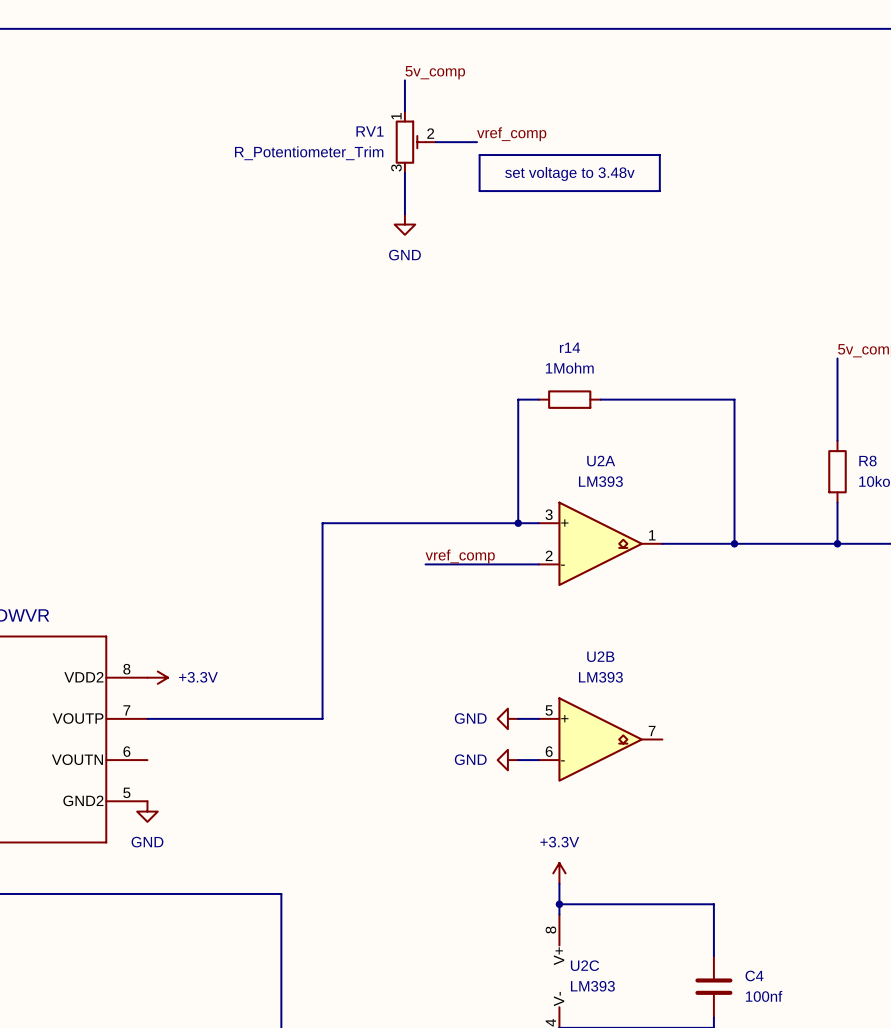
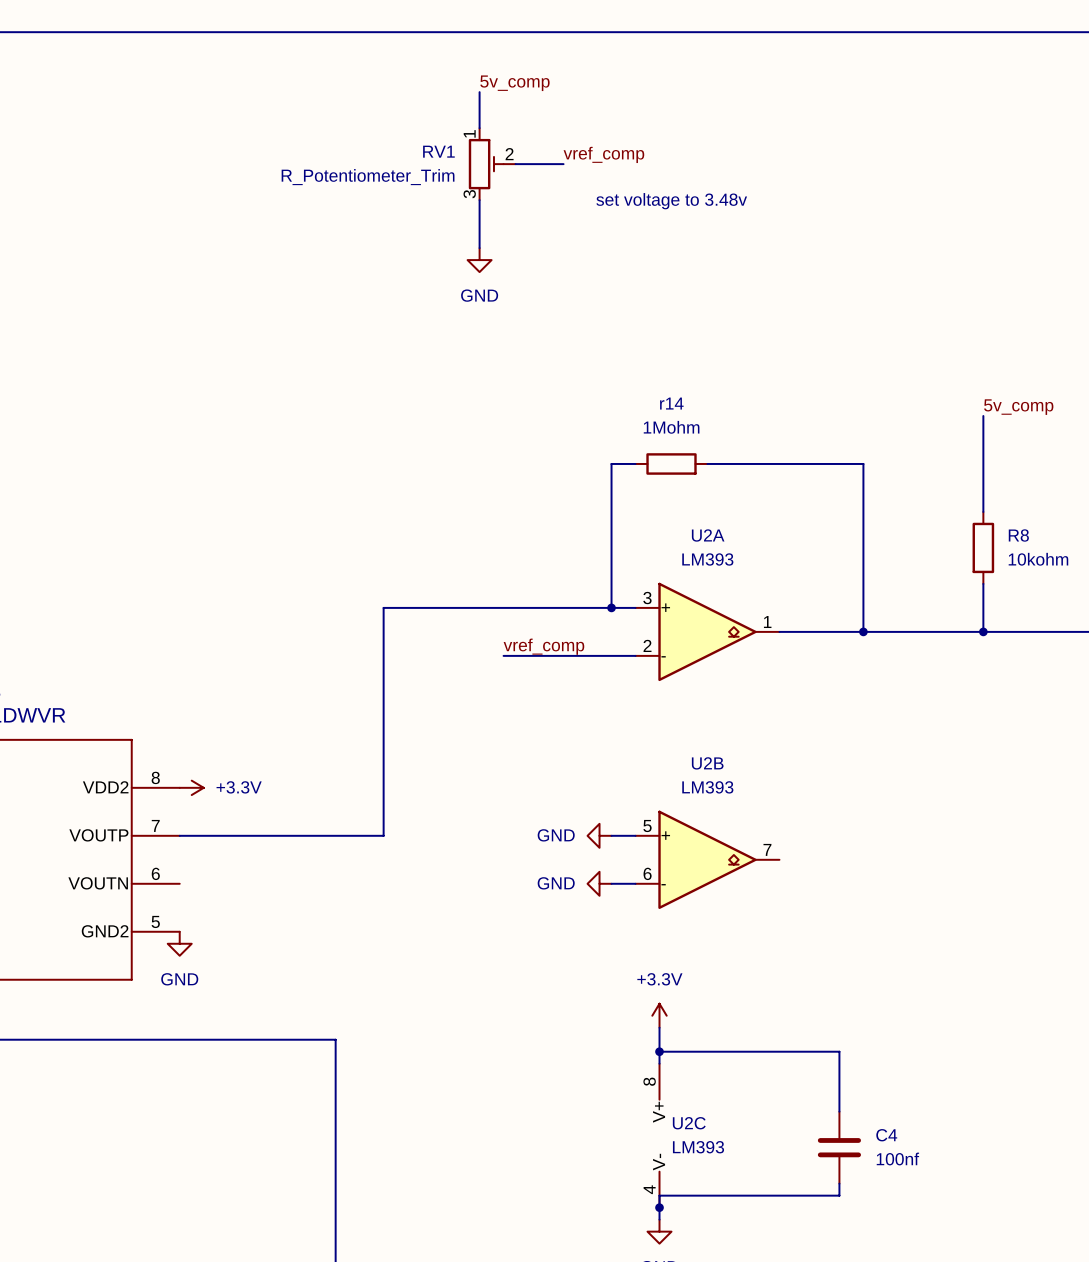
line: (479, 155) (659, 155) (659, 191) (479, 191) (479, 155) -> none

